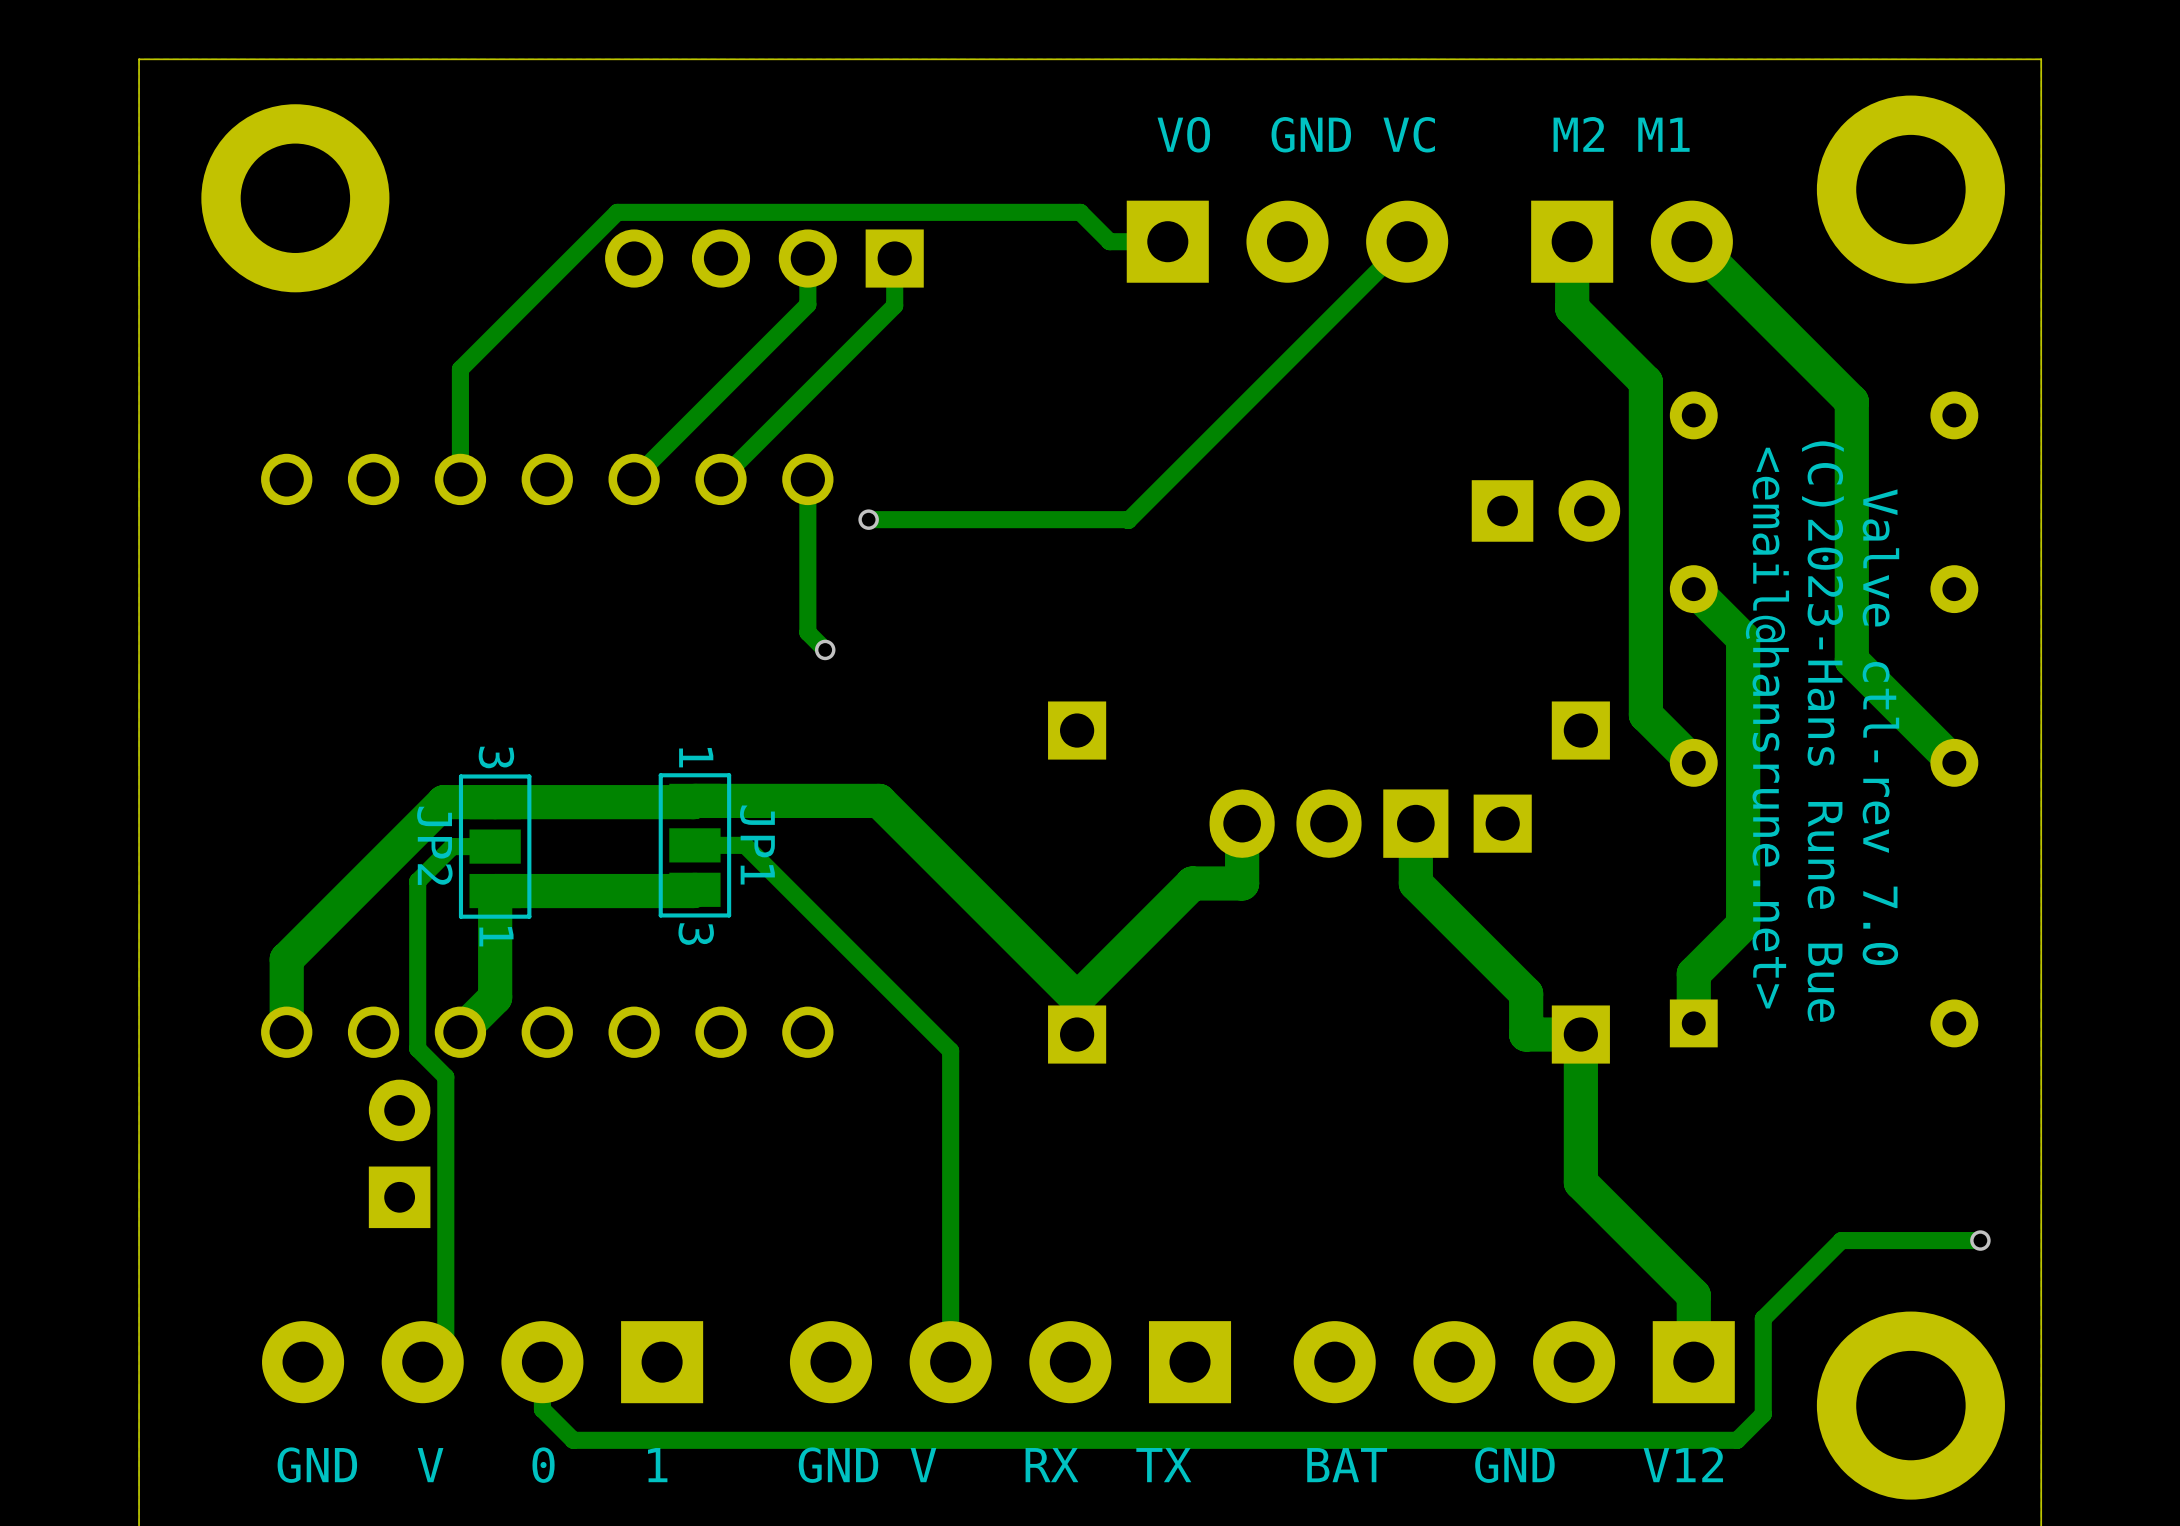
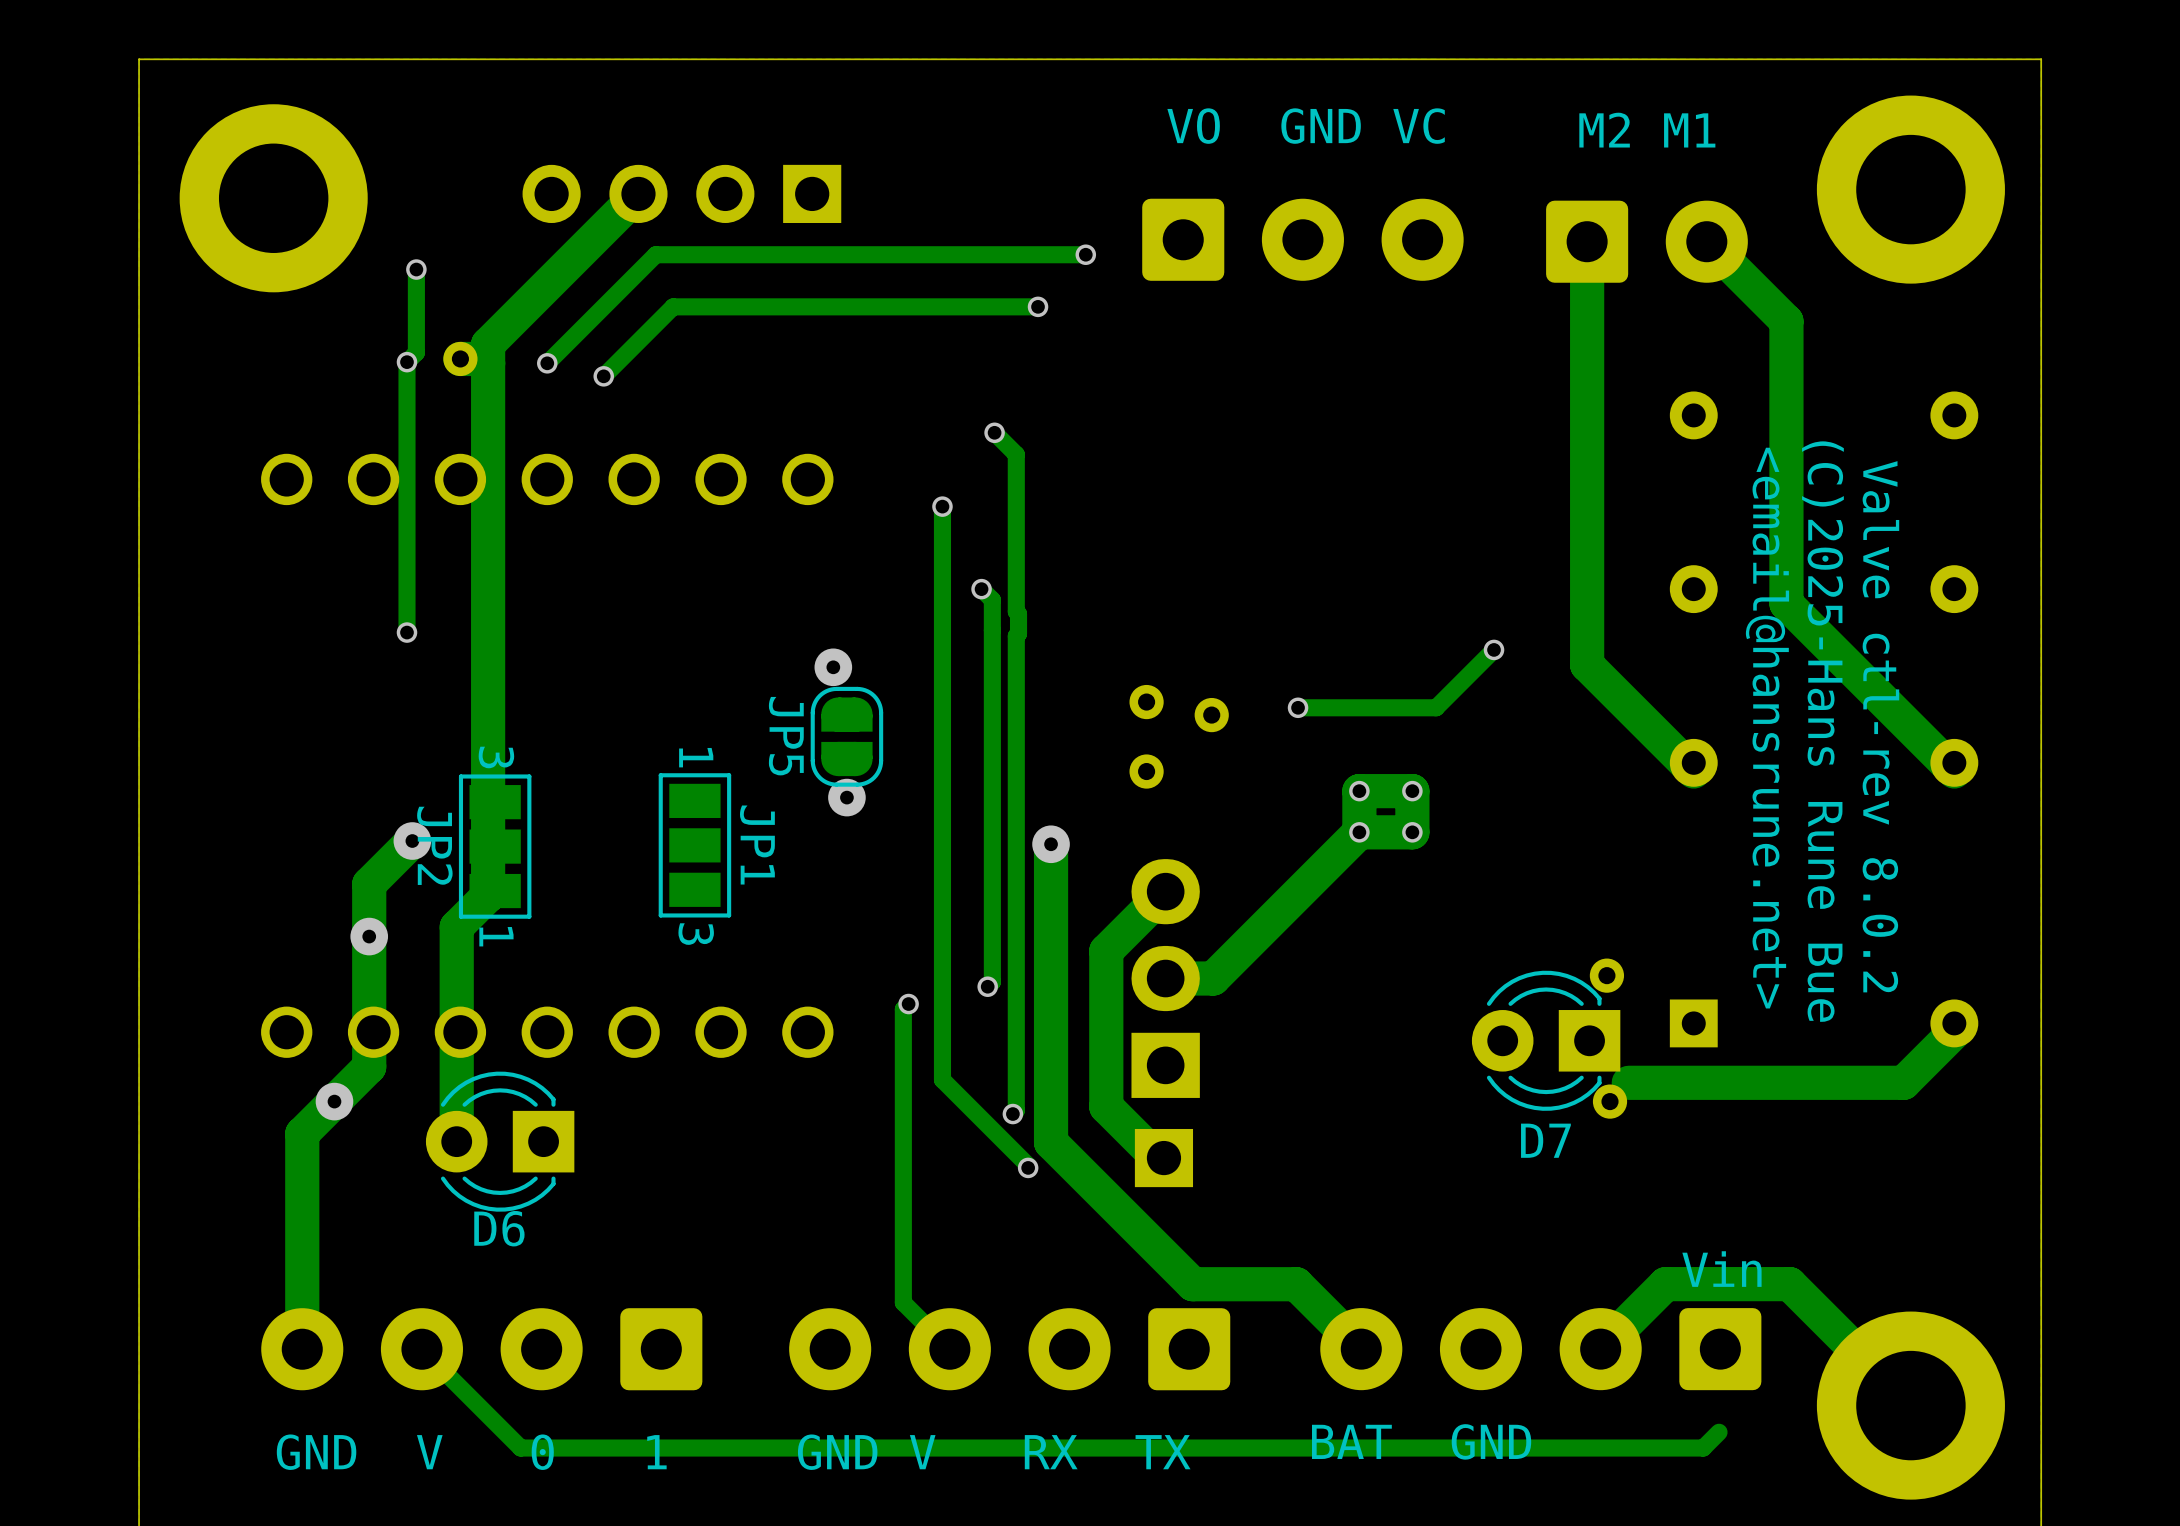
text: none -> M2 M1 (1647, 130)
text: VO GND VC M2 M1 (1423, 134) -> VO GND VC (1306, 126)
track: none -> (638, 193) (488, 344) (488, 895) (456, 927) (456, 1141)
part position: (295, 198) -> (273, 198)
part footprint: [1126, 200, 1449, 283] -> [1142, 198, 1464, 281]
part footprint: [1531, 200, 1733, 283] -> [1546, 200, 1748, 283]
track: (1167, 241) (1109, 241) (1080, 212) (617, 212) (460, 369) (460, 479) -> none
track: (1407, 241) (1128, 520) (868, 519) -> none
track: (1572, 241) (1572, 308) (1645, 382) (1645, 714) (1693, 762) -> none
track: none -> (1587, 241) (1587, 664) (1693, 771)
track: (1691, 241) (1851, 401) (1851, 660) (1954, 762) -> none
track: none -> (1706, 241) (1786, 321) (1786, 603) (1954, 771)
track: none -> (1085, 254) (655, 254) (547, 363)
via: none -> (1085, 254)
part position: (764, 258) -> (681, 193)
track: (807, 258) (807, 304) (634, 479) -> none
track: (894, 258) (894, 305) (720, 479) -> none
track: none -> (416, 269) (416, 352) (406, 362) (406, 632)
via: none -> (416, 269)
track: none -> (1038, 306) (673, 306) (603, 376)
via: none -> (1038, 306)
part: none -> (460, 358)
via: none -> (406, 362)
via: none -> (547, 363)
via: none -> (603, 376)
track: none -> (994, 432) (1016, 454) (1016, 611) (1018, 613) (1018, 633) (1016, 636) (1016, 1110) (1012, 1114)
via: none -> (994, 432)
track: (807, 479) (807, 632) (825, 649) -> none
track: none -> (942, 506) (942, 1079) (1028, 1165) (1028, 1167)
via: none -> (942, 506)
D7 side: top (1545, 510) -> bottom (1546, 1040)
via: (868, 519) -> none
track: none -> (981, 589) (992, 599) (992, 982) (987, 986)
via: none -> (981, 589)
track: (1693, 589) (1743, 638) (1743, 924) (1693, 973) (1693, 1023) -> none
via: none -> (406, 632)
via size: [814, 639, 836, 661] -> [814, 648, 853, 687]
track: none -> (1494, 649) (1436, 707) (1298, 707)
via: none -> (1494, 649)
part: none -> (1146, 702)
via: none -> (1298, 707)
part: none -> (1211, 715)
text: Valve ctl-rev 7.0 (1880, 727) -> Valve ctl-rev 8.0.2 (1880, 726)
part: (1077, 730) -> none
part: (1580, 730) -> none
text: (C)2023-Hans Rune Bue (1822, 731) -> (C)2025-Hans Rune Bue (1822, 731)
JP5: none -> (846, 736)
part: none -> (1146, 771)
via: none -> (1359, 791)
via: none -> (1412, 791)
via: none -> (846, 797)
track: (1242, 823) (1242, 883) (1192, 883) (1077, 998) -> none
part rotation: 0° (1328, 823) -> 90° clockwise (1165, 978)
part position: (1328, 823) -> (1165, 978)
track: (1415, 823) (1415, 883) (1526, 993) (1526, 1034) (1580, 1034) (1580, 1182) (1693, 1295) (1693, 1362) -> none
part: (1502, 823) -> none
track: none -> (1359, 832) (1213, 978) (1165, 978)
track: none -> (1359, 832) (1412, 832) (1412, 791) (1359, 791) (1359, 832)
via: none -> (1359, 832)
via: none -> (1412, 832)
track: none -> (412, 841) (369, 884) (369, 1066) (302, 1133) (302, 1349)
via: none -> (412, 841)
track: none -> (1051, 844) (1051, 1142) (1192, 1284) (1296, 1284) (1361, 1349)
via: none -> (1051, 844)
track: (694, 845) (745, 845) (950, 1050) (950, 1362) -> none
track: (495, 846) (452, 846) (417, 881) (417, 1048) (445, 1076) (445, 1339) (422, 1362) -> none
track: (694, 889) (495, 891) (495, 997) (460, 1032) -> none
track: none -> (1165, 891) (1106, 951) (1106, 1106) (1157, 1158) (1163, 1158)
via: none -> (369, 936)
part: none -> (1606, 975)
via: none -> (987, 986)
track: (1077, 998) (879, 800) (443, 802) (286, 959) (286, 1032) -> none
track: none -> (908, 1004) (903, 1009) (903, 1302) (949, 1349)
via: none -> (908, 1004)
track: none -> (1954, 1032) (1903, 1082) (1628, 1082)
part position: (1077, 1034) -> (1163, 1158)
part: (1580, 1034) -> none
via: none -> (334, 1101)
part: none -> (1610, 1101)
via: none -> (1012, 1114)
D6 side: top (399, 1153) -> bottom (500, 1141)
via: none -> (1028, 1167)
track: (1980, 1240) (1841, 1240) (1763, 1318) (1763, 1414) (1737, 1440) (573, 1440) (542, 1409) (542, 1362) -> none
via: (1980, 1240) -> none
text: none -> Vin (1721, 1269)
part footprint: [262, 1321, 704, 1404] -> [261, 1308, 703, 1391]
part footprint: [789, 1321, 1232, 1404] -> [789, 1308, 1231, 1391]
part footprint: [1293, 1321, 1735, 1404] -> [1320, 1308, 1762, 1391]
track: none -> (421, 1349) (520, 1448) (1703, 1448) (1719, 1432)
track: none -> (1600, 1349) (1665, 1284) (1789, 1284) (1904, 1398)
text position: GND V 0 1 (472, 1465) -> GND V 0 1 (471, 1452)
text position: GND V RX TX (995, 1465) -> GND V RX TX (994, 1452)
text: BAT GND V12 (1515, 1465) -> BAT GND (1421, 1441)

